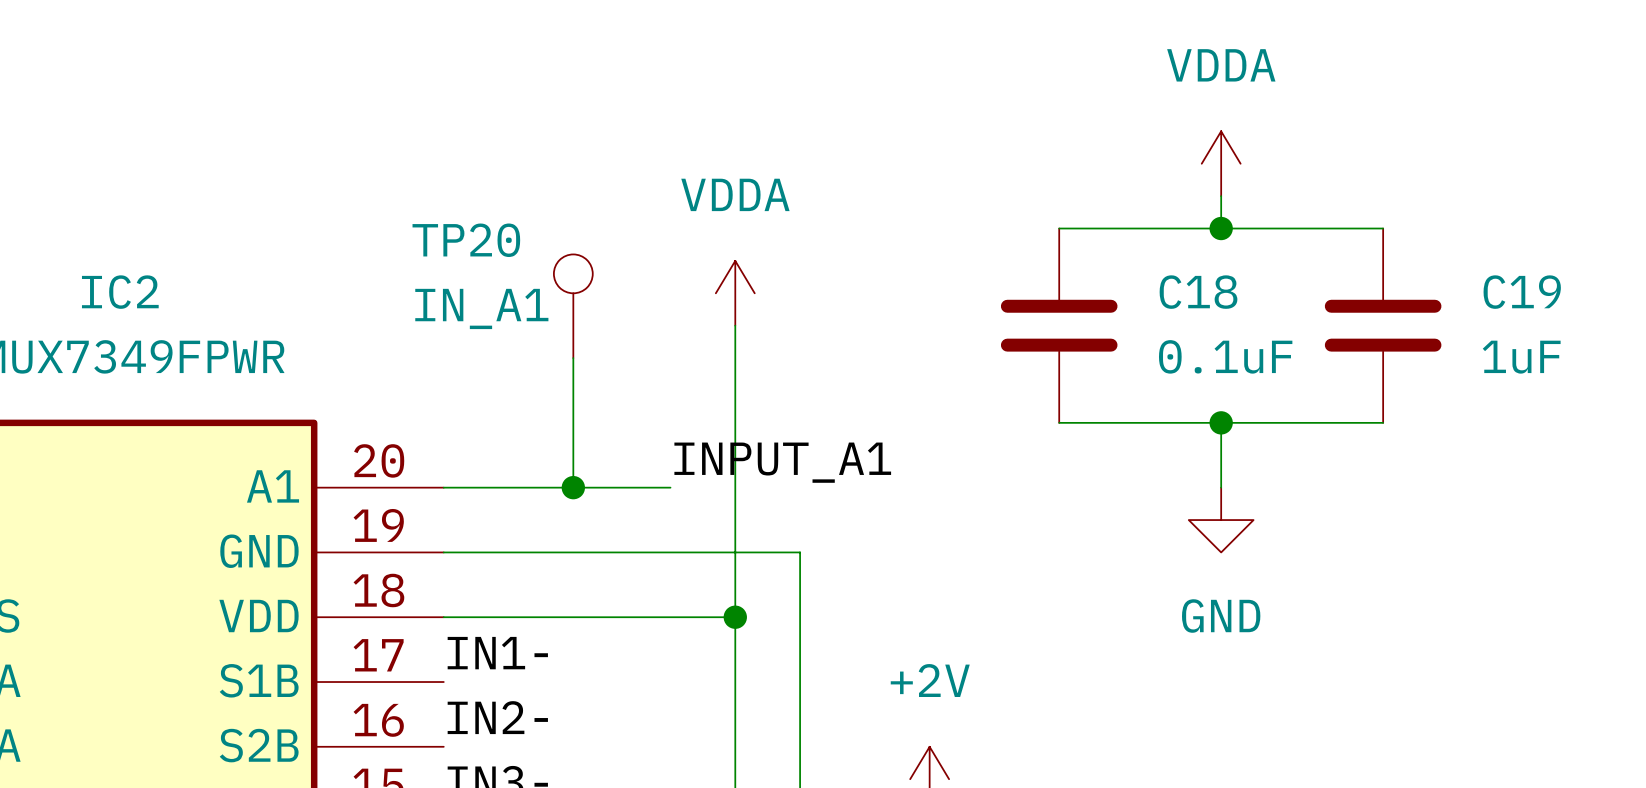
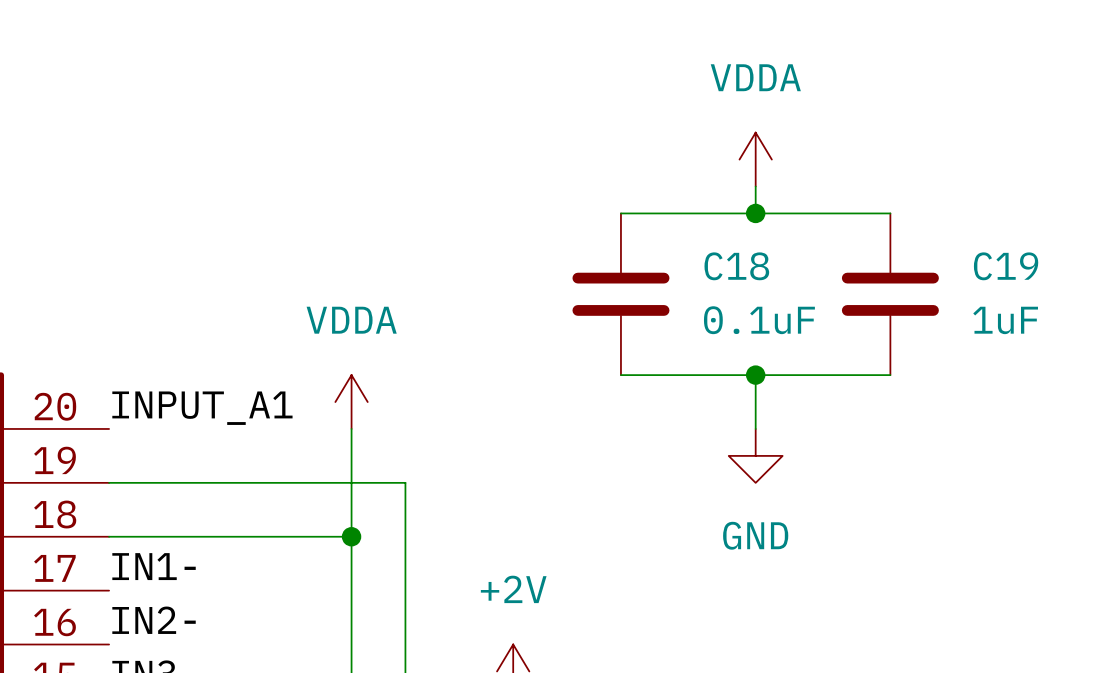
power symbol position: VDDA (735, 293) -> VDDA (351, 402)
TP20: IN_A1 (573, 306) -> none
wire: (735, 325) (735, 487) -> none
wire: (573, 358) (573, 487) -> none
label position: INPUT_A1 (782, 462) -> INPUT_A1 (202, 408)
wire: (443, 487) (670, 487) -> none
junction: (573, 487) -> none

